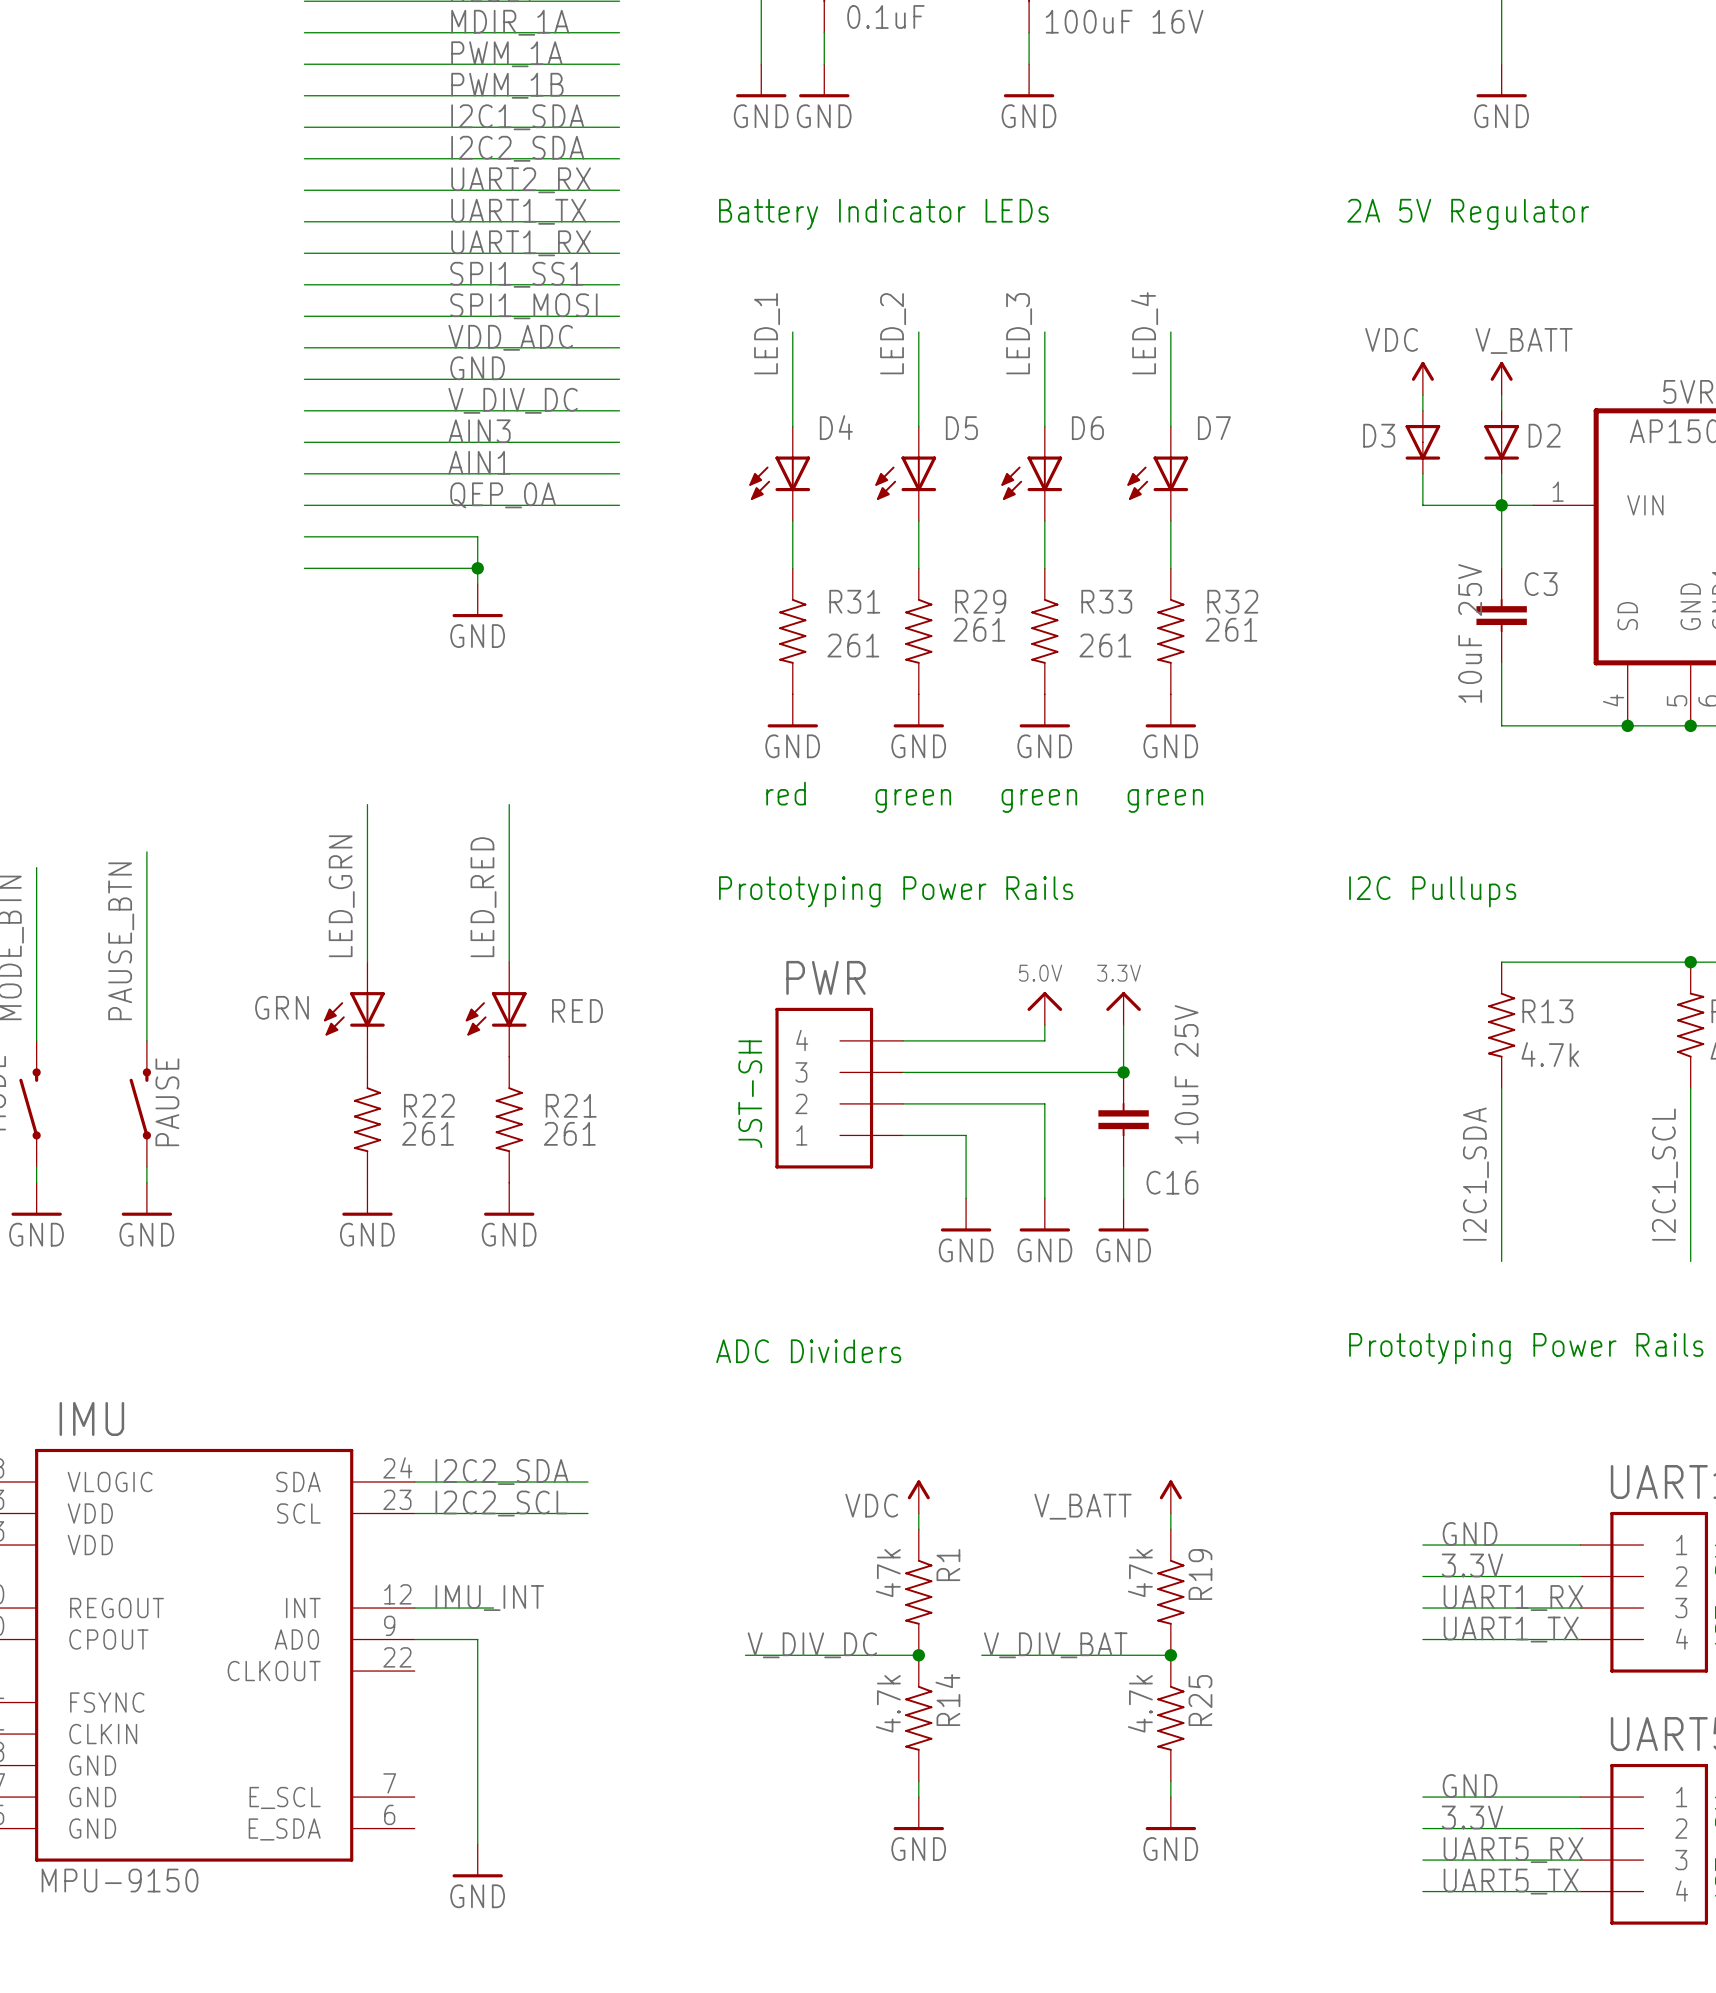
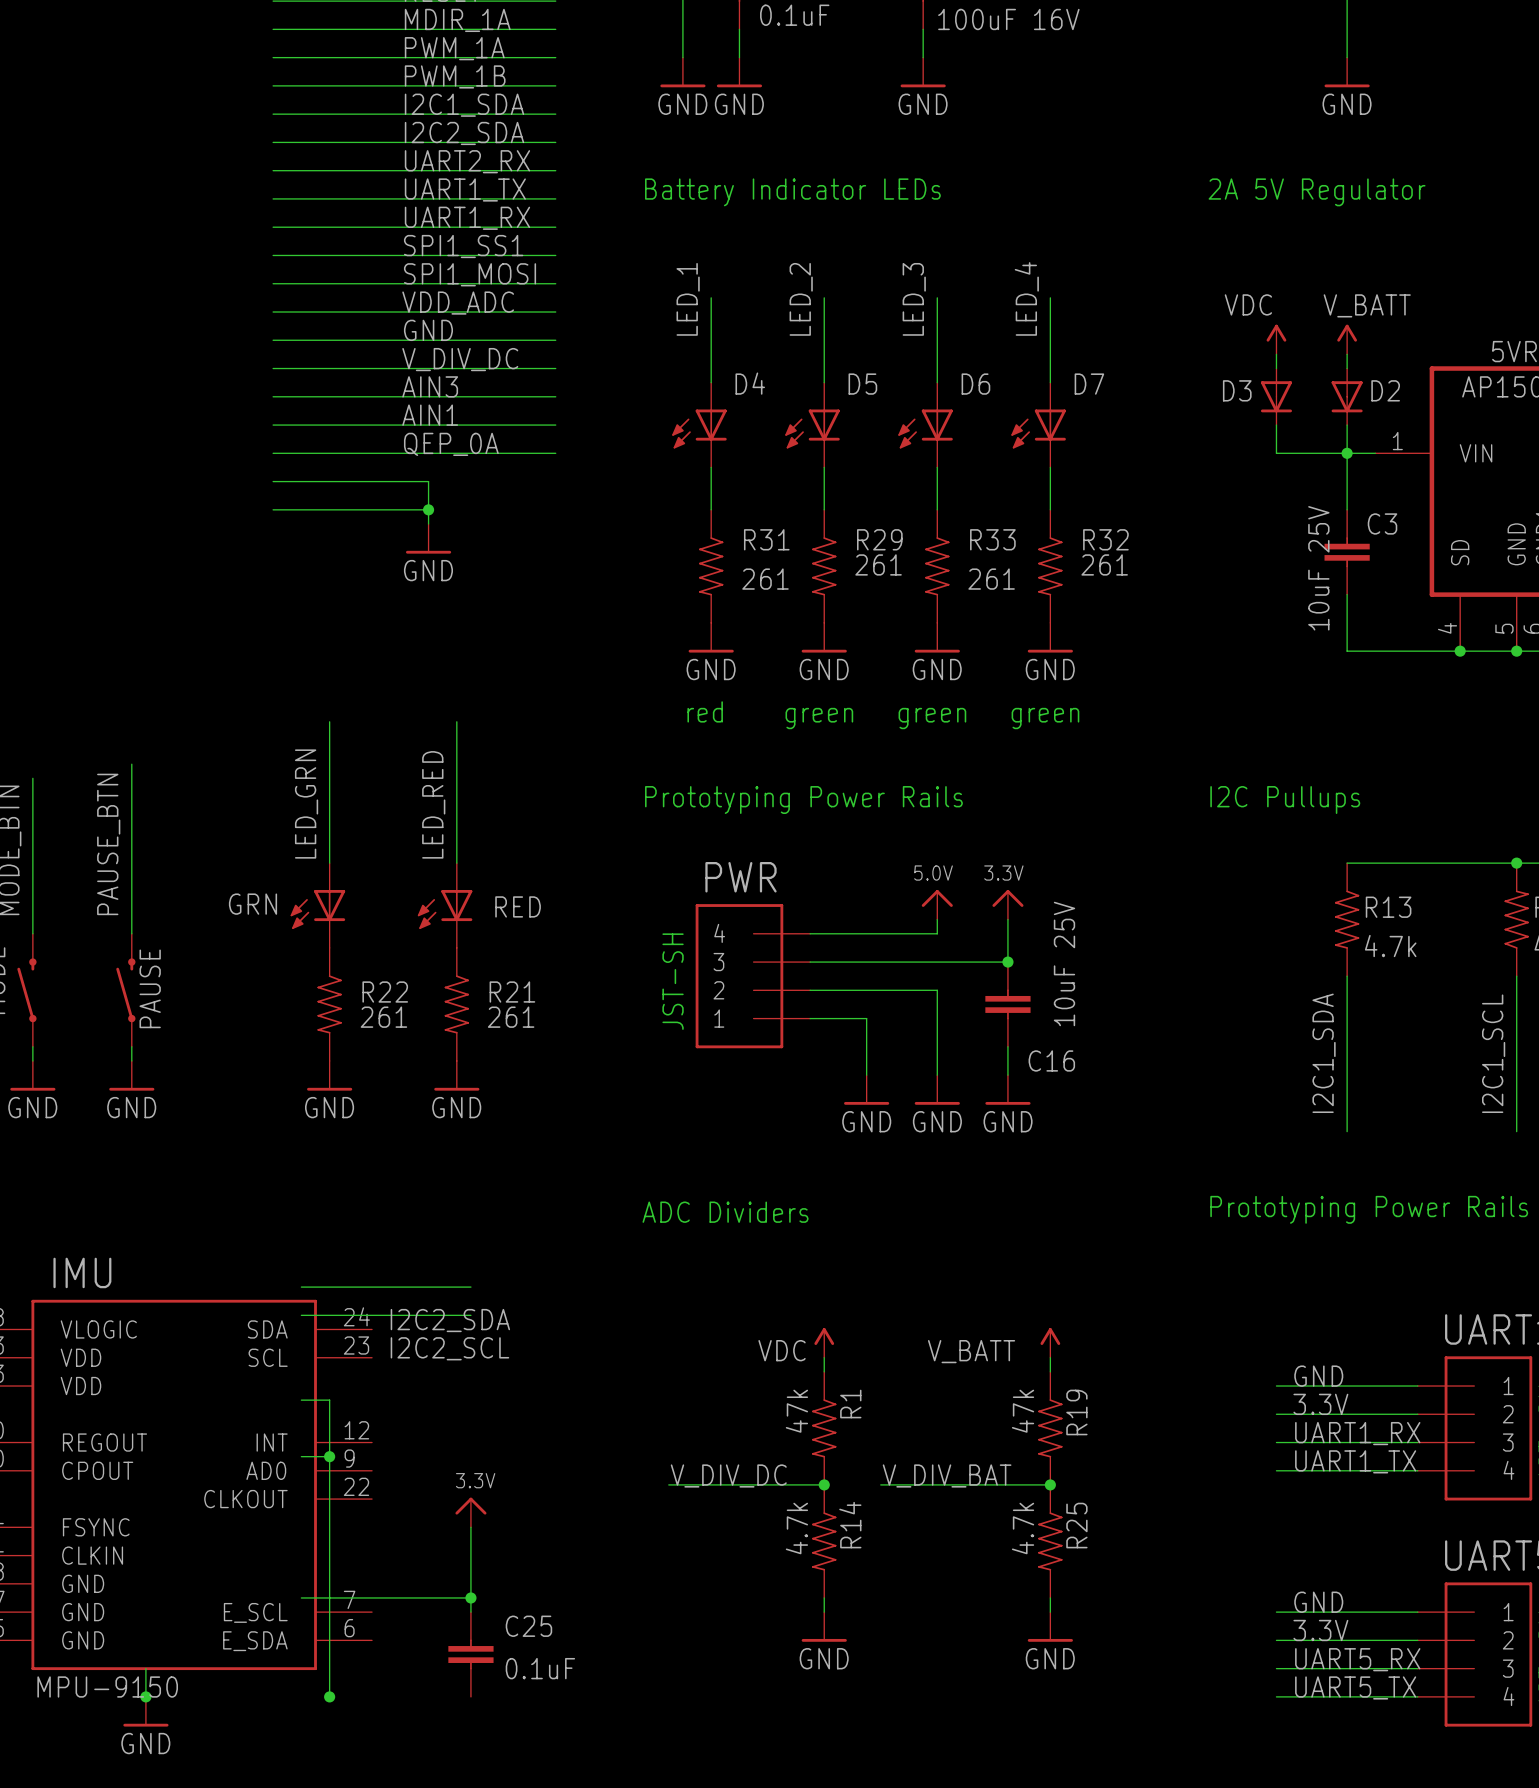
wire: none -> (301, 1287) (470, 1287)
wire: none -> (301, 1315) (470, 1315)
wire: (414, 1481) (587, 1481) -> none
wire: (414, 1513) (587, 1513) -> none
wire: none -> (301, 1400) (329, 1400) (329, 1696)
label: IMU_INT (489, 1598) -> none
wire: (414, 1608) (493, 1608) -> none
wire: none -> (301, 1456) (329, 1456)
junction: none -> (329, 1456)
wire: (414, 1639) (477, 1639) (477, 1844) -> none
power symbol: none -> 3.3V (470, 1512)
wire: none -> (470, 1527) (470, 1612)
wire: none -> (301, 1597) (470, 1597)
junction: none -> (470, 1597)
C25: none -> 0.1uF (470, 1654)
wire: none -> (145, 1668) (145, 1696)
power symbol: GND (477, 1860) -> none
junction: none -> (145, 1696)
junction: none -> (329, 1696)
power symbol: none -> GND (145, 1711)

